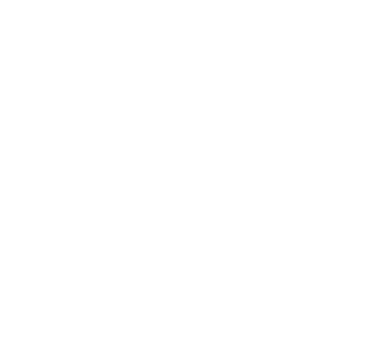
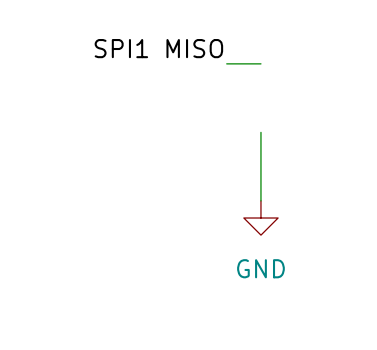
label: none -> SPI1 MISO (158, 48)
wire: none -> (226, 63) (260, 63)
wire: none -> (260, 132) (260, 200)
power symbol: none -> GND (260, 218)

